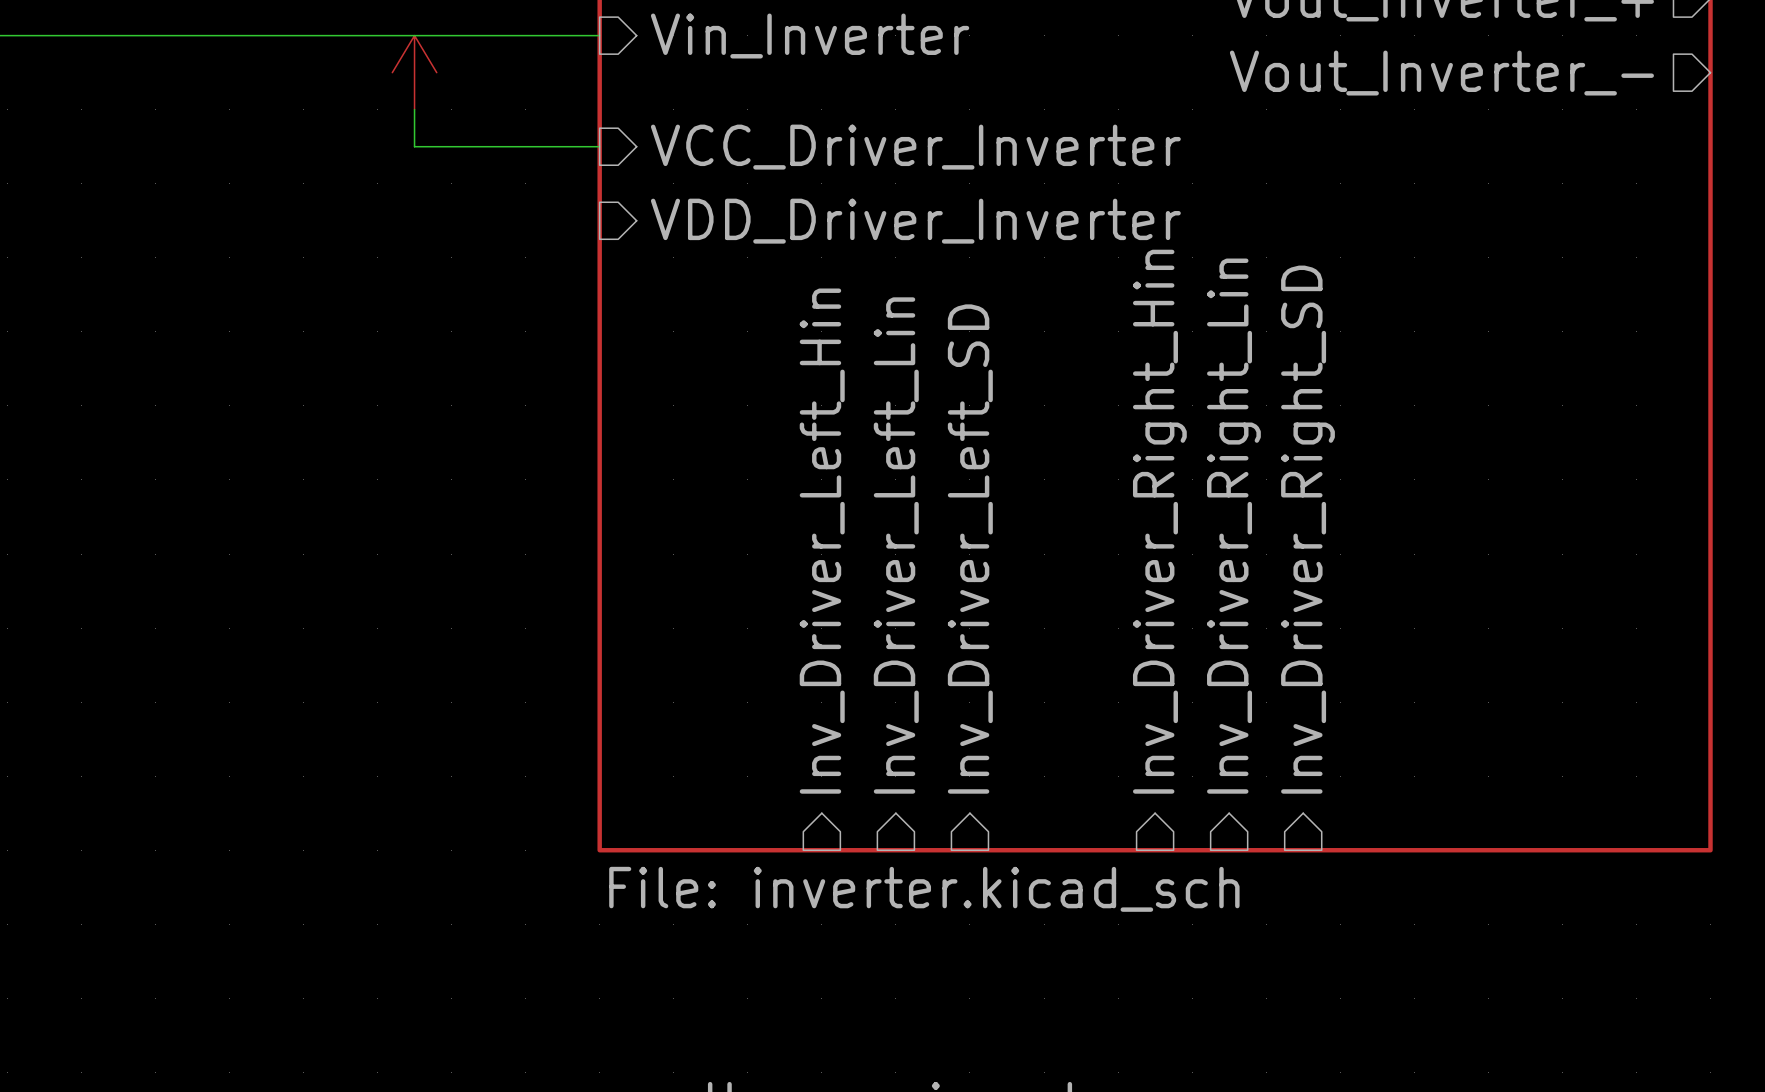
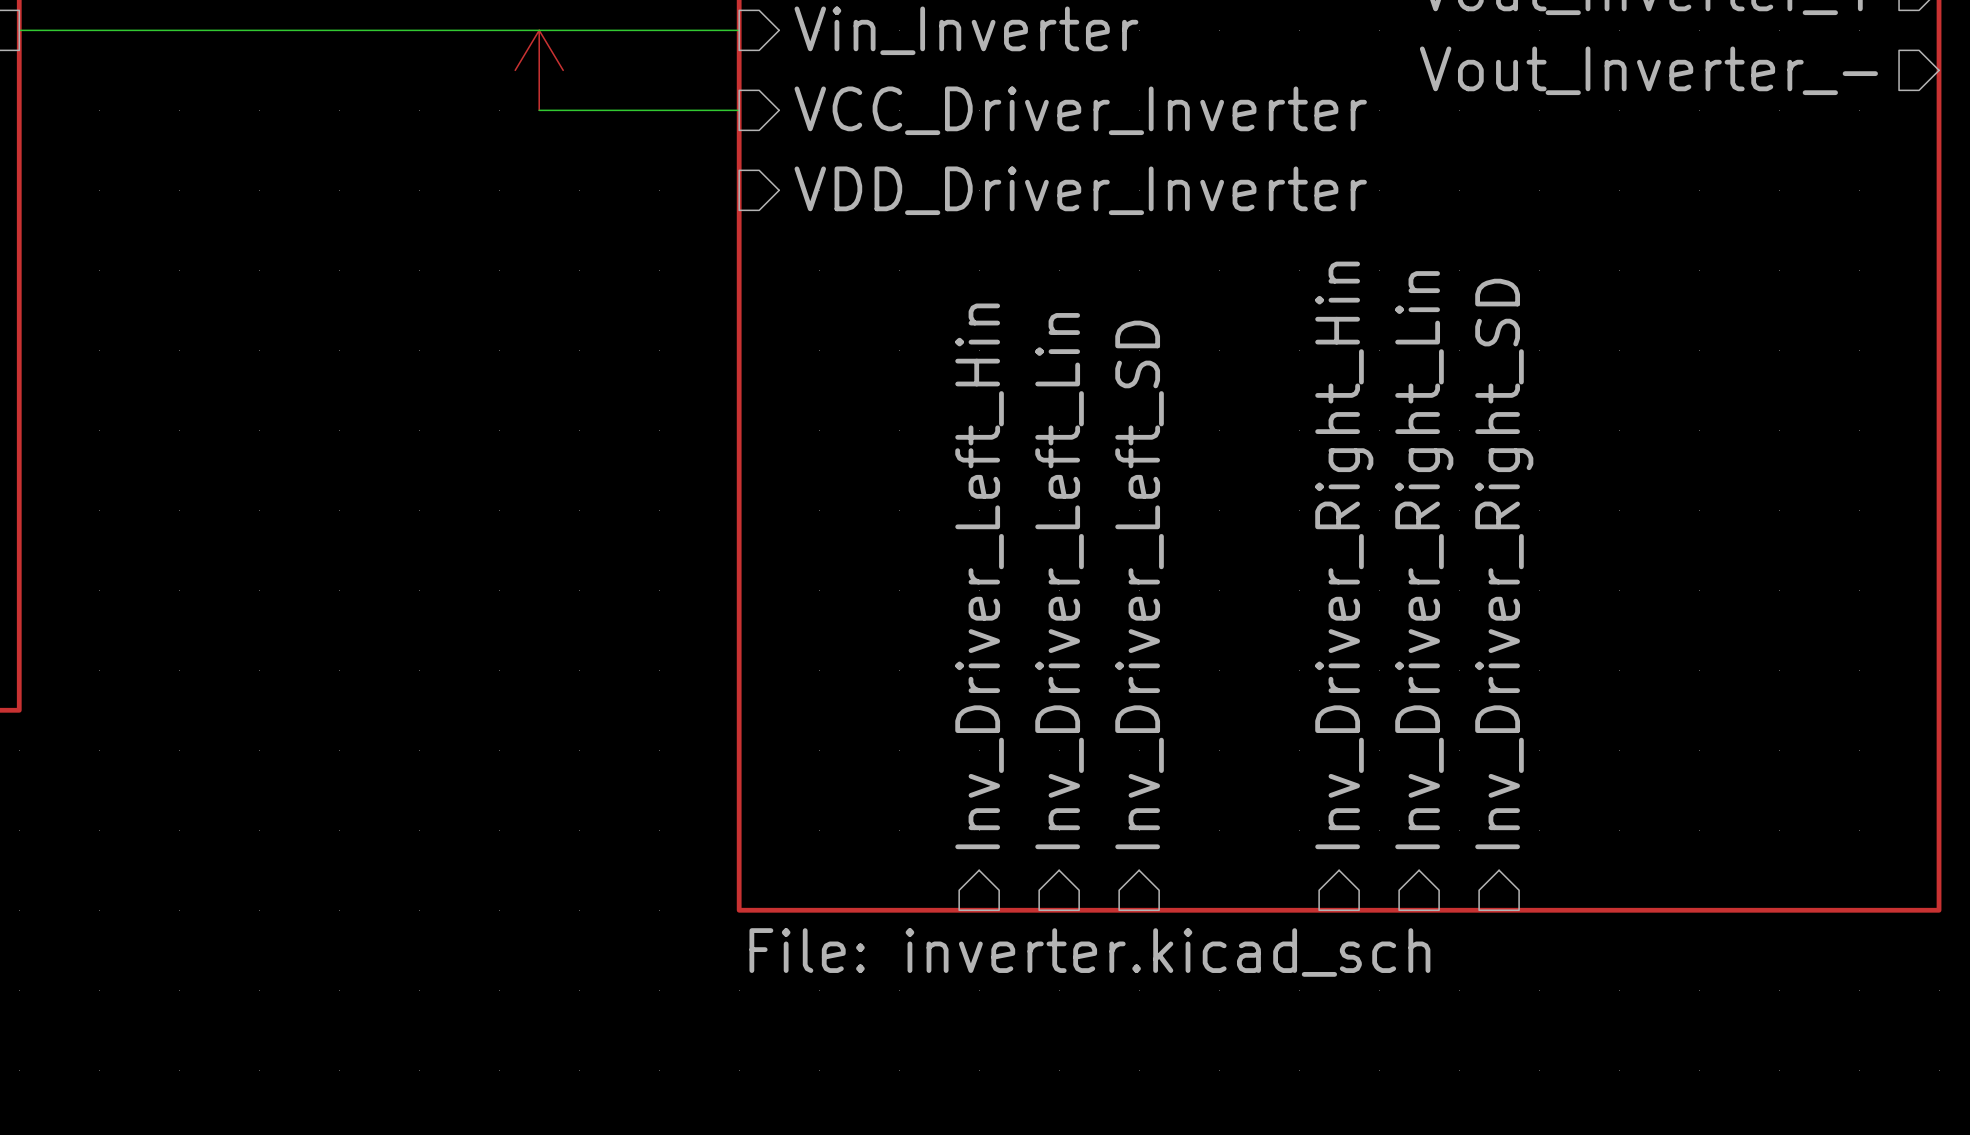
wire: (414, 109) (414, 146) (599, 146) -> (539, 110) (739, 110)
sheet pin position: VCC_Driver_Inverter (915, 147) -> VCC_Driver_Inverter (1080, 110)
sheet pin position: VDD_Driver_Inverter (915, 221) -> VDD_Driver_Inverter (1080, 190)

